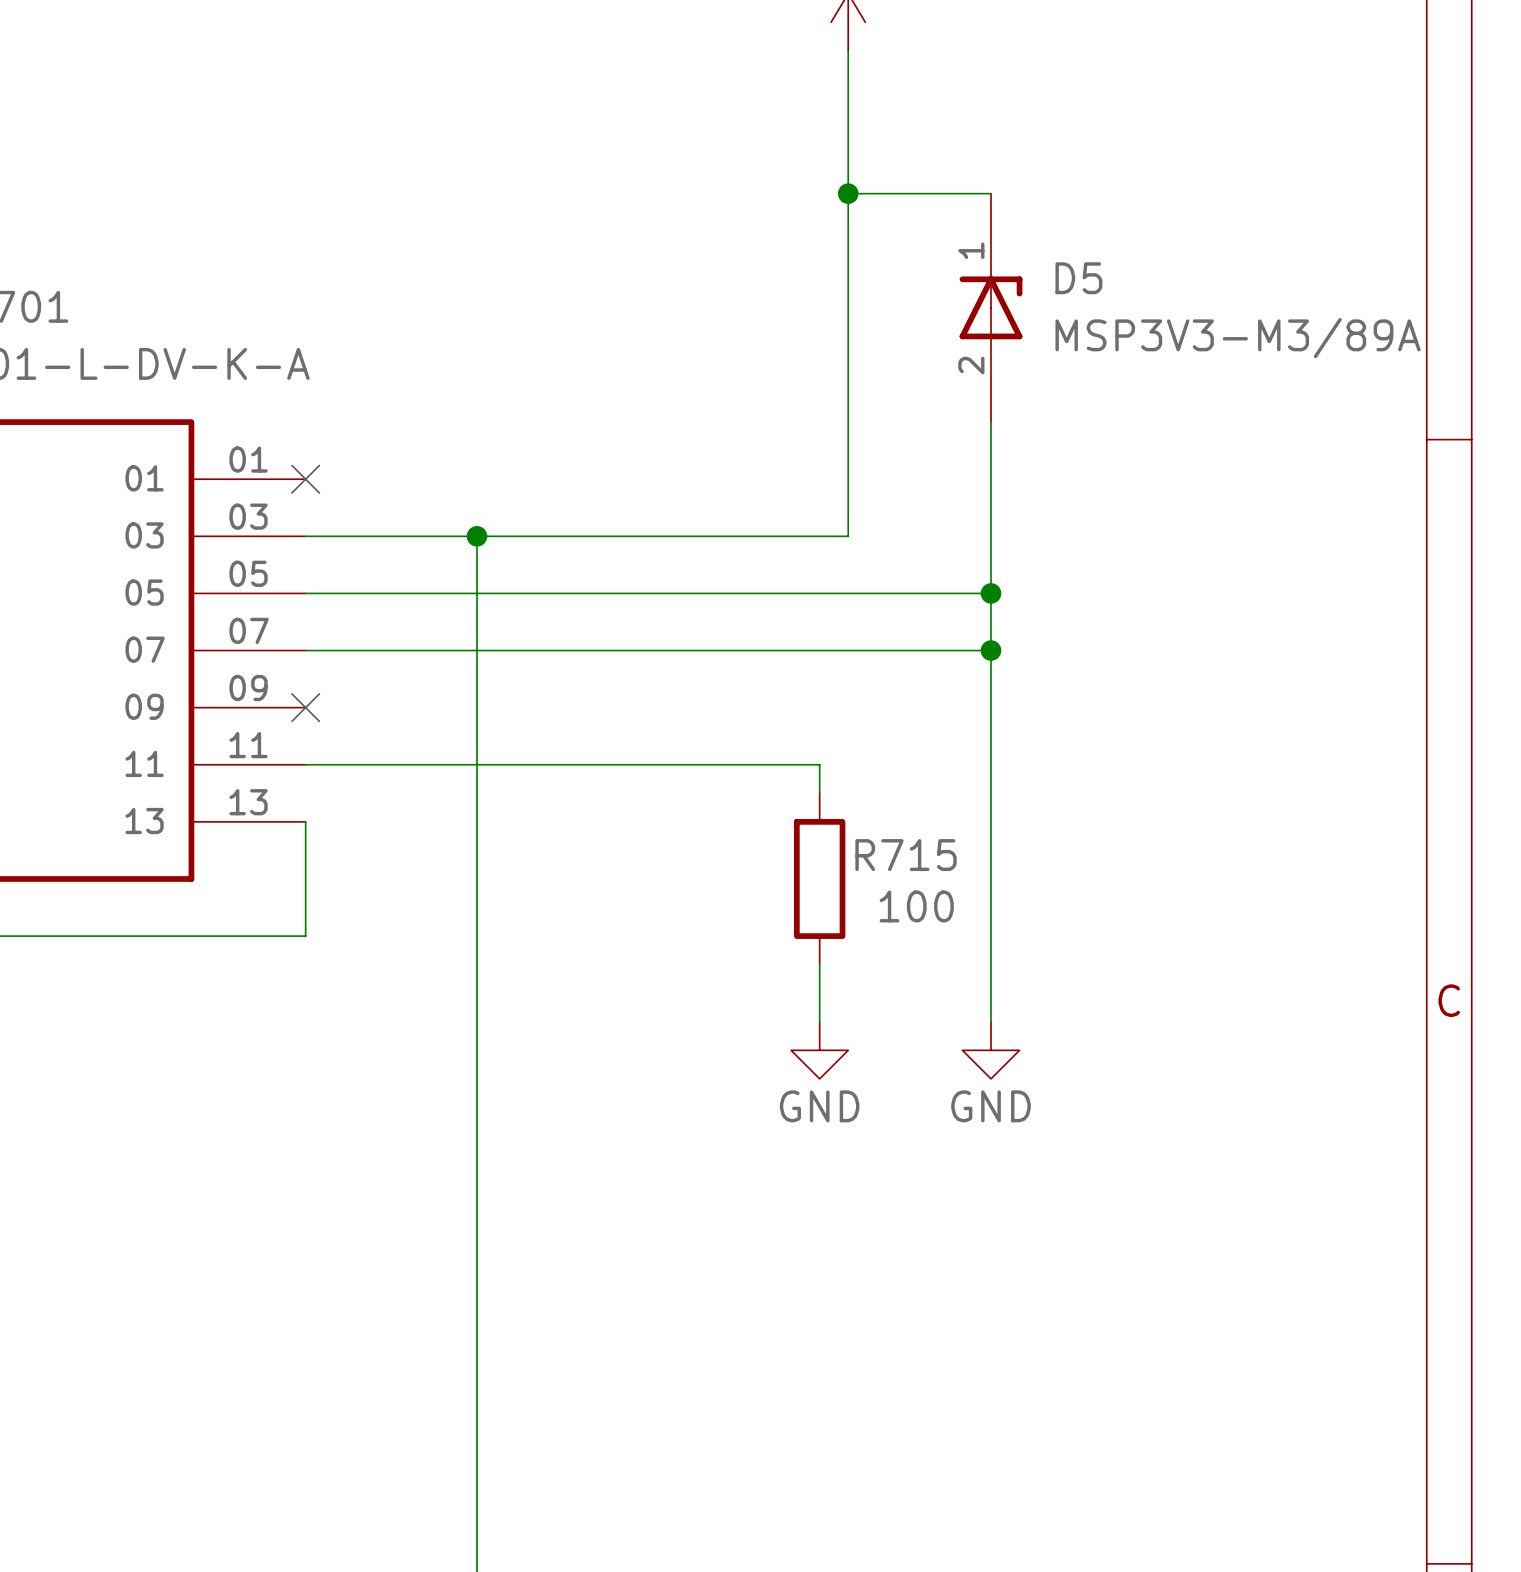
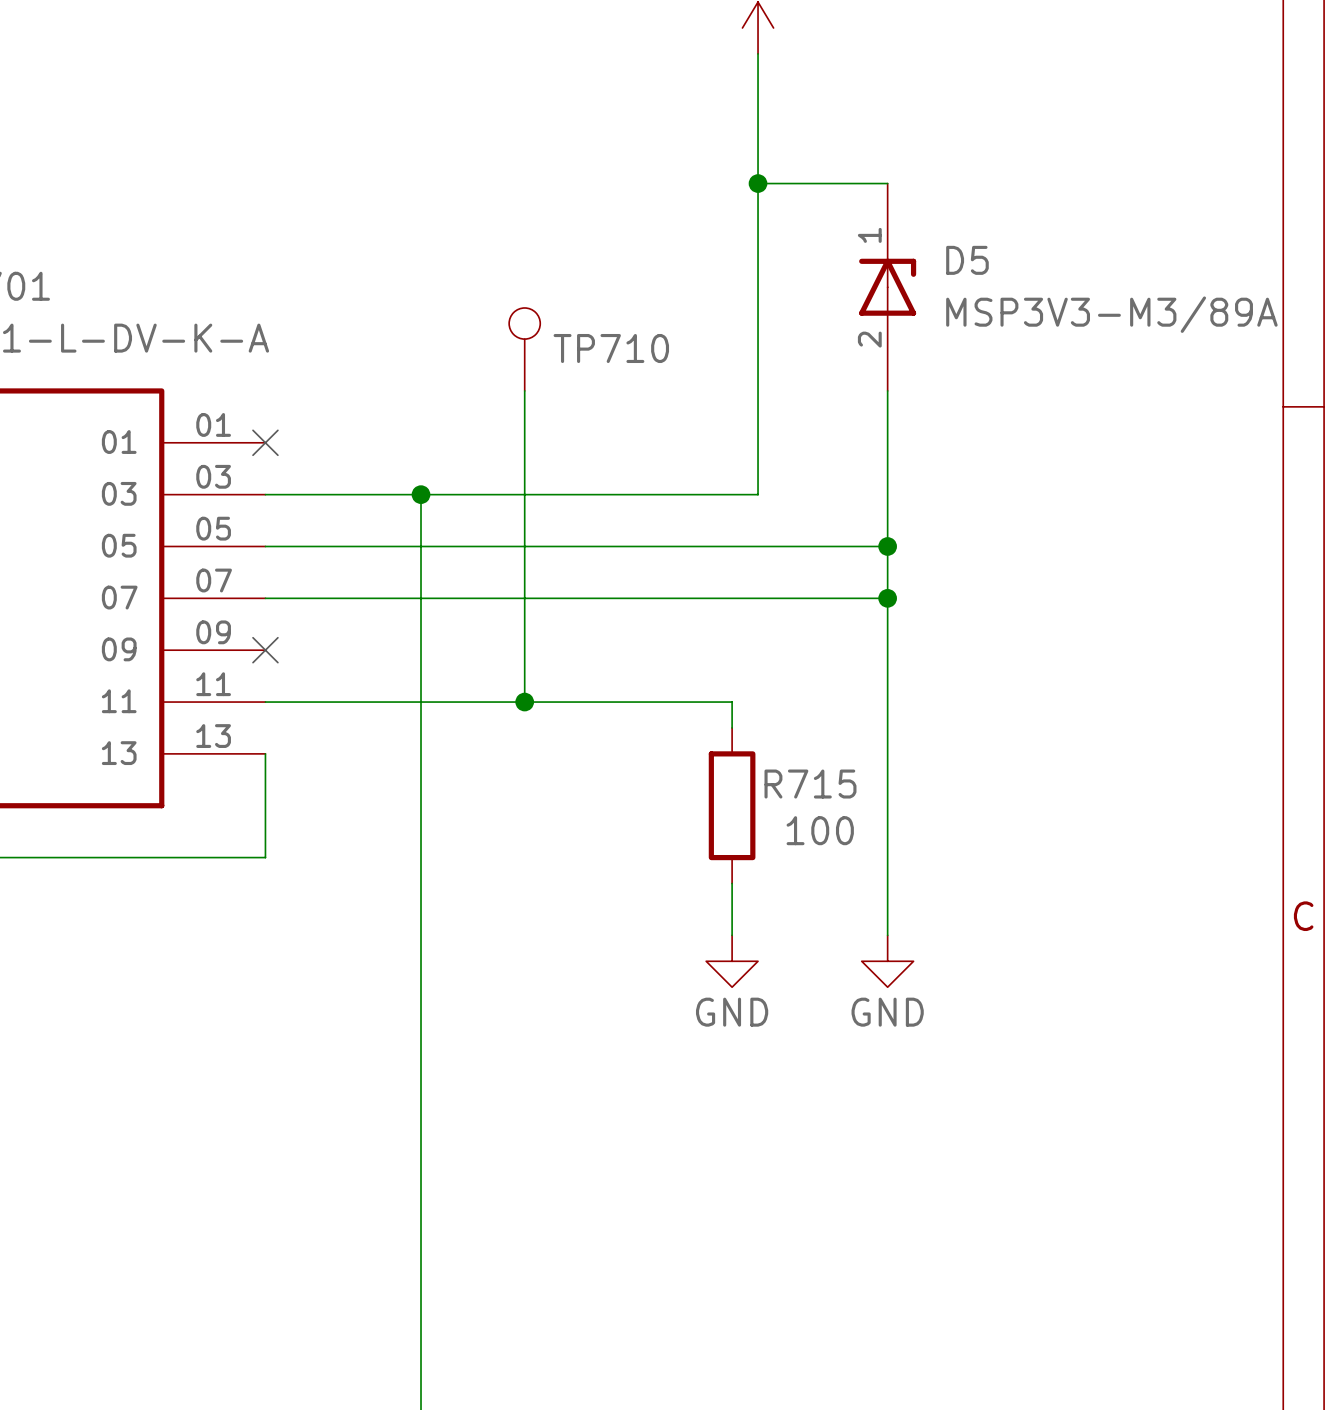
TP710: none -> (524, 349)
wire: none -> (524, 390) (524, 702)
junction: none -> (524, 702)

